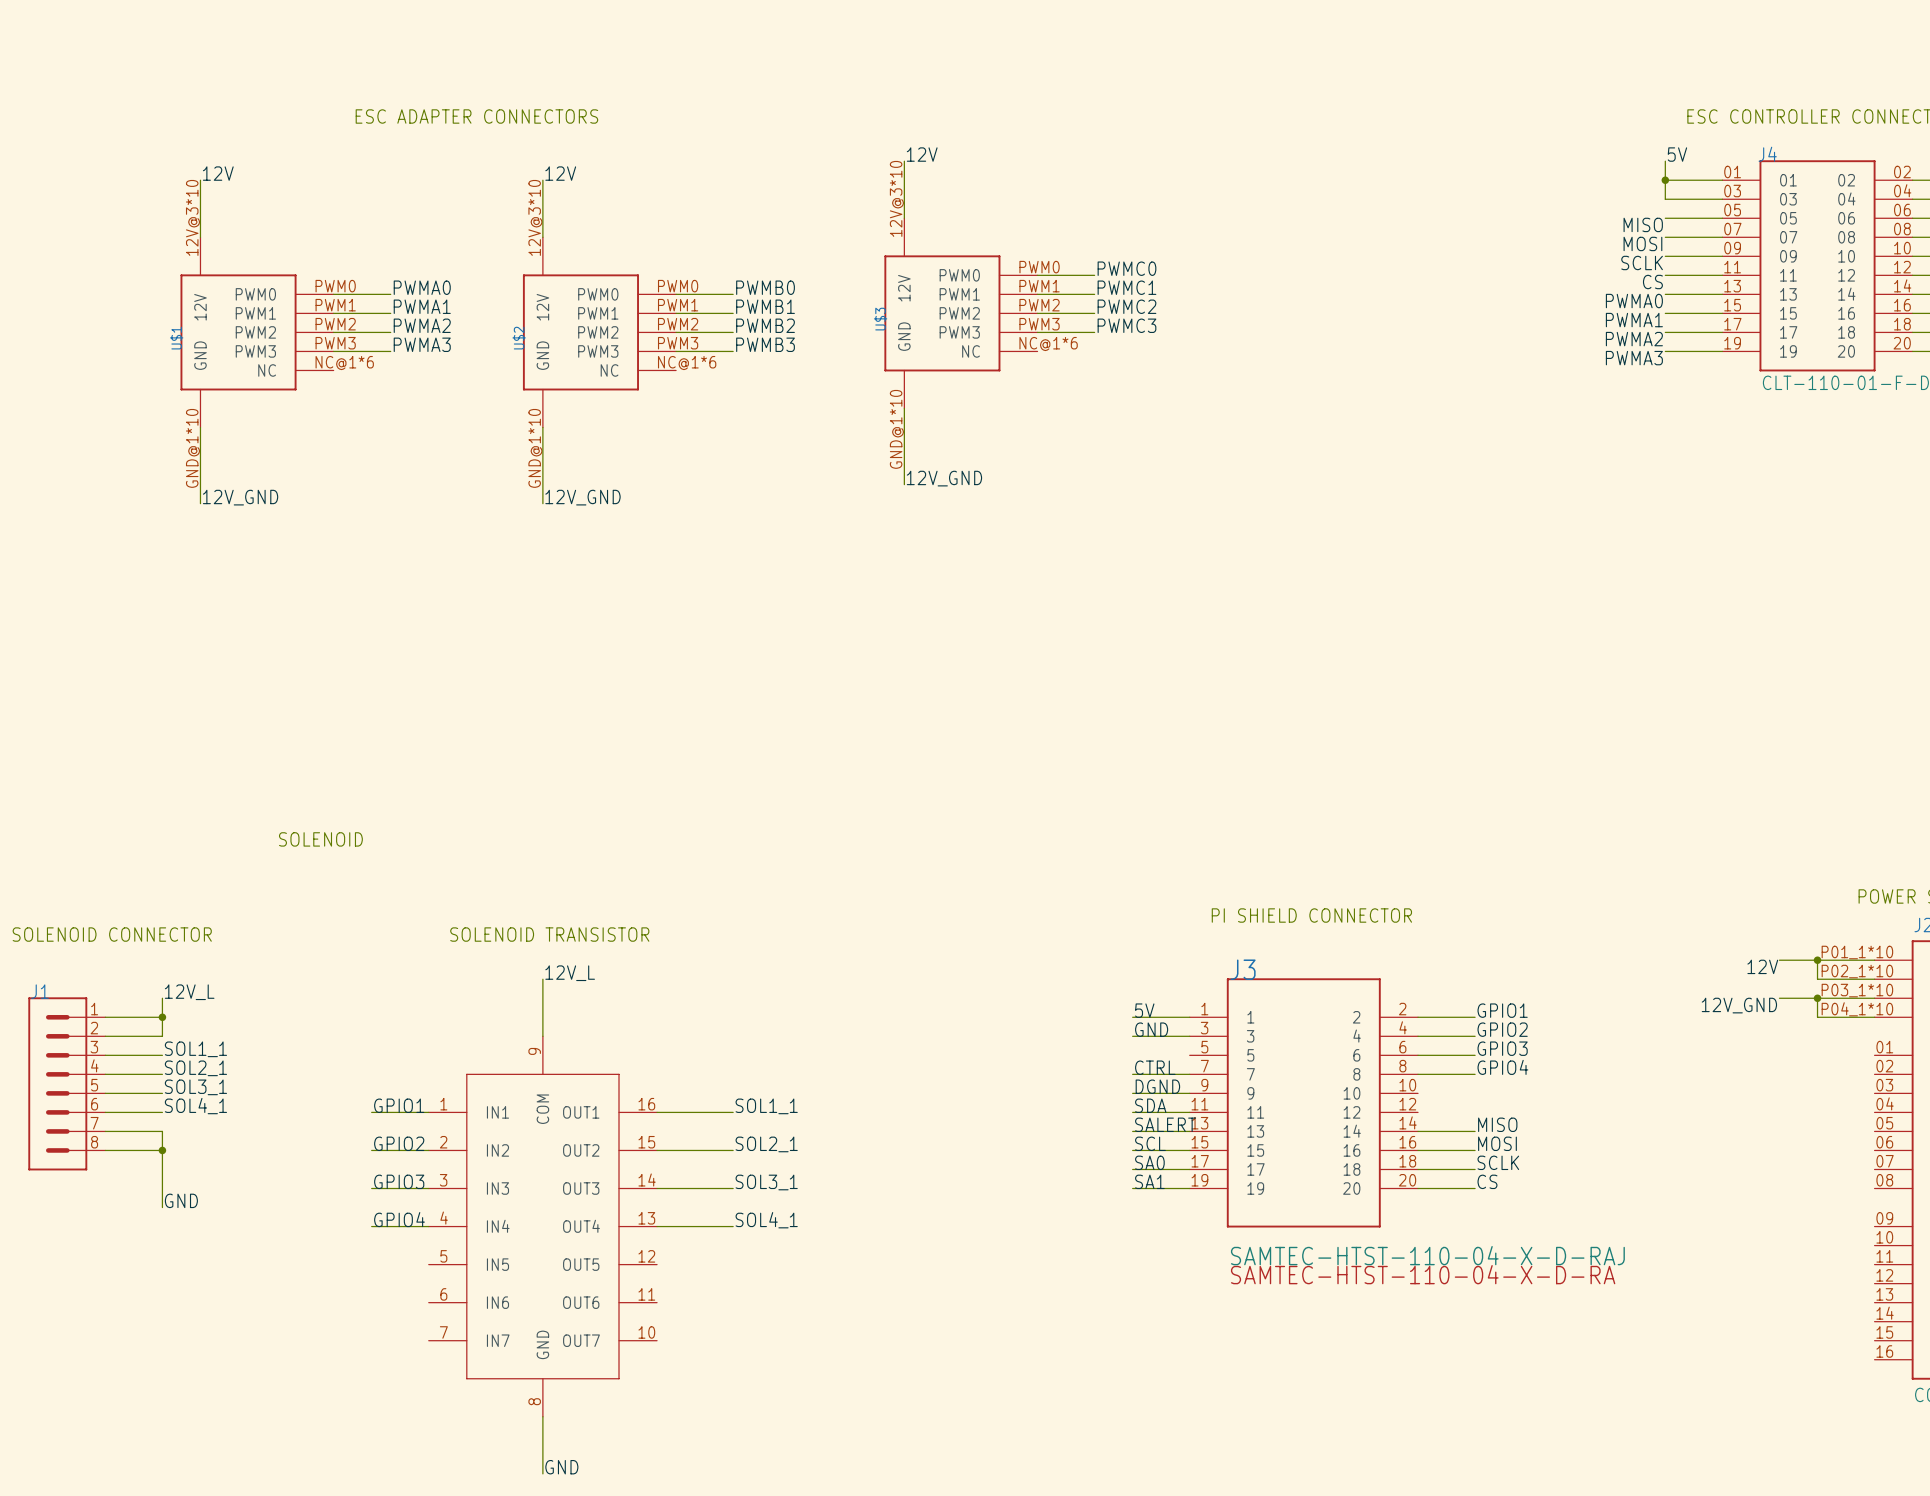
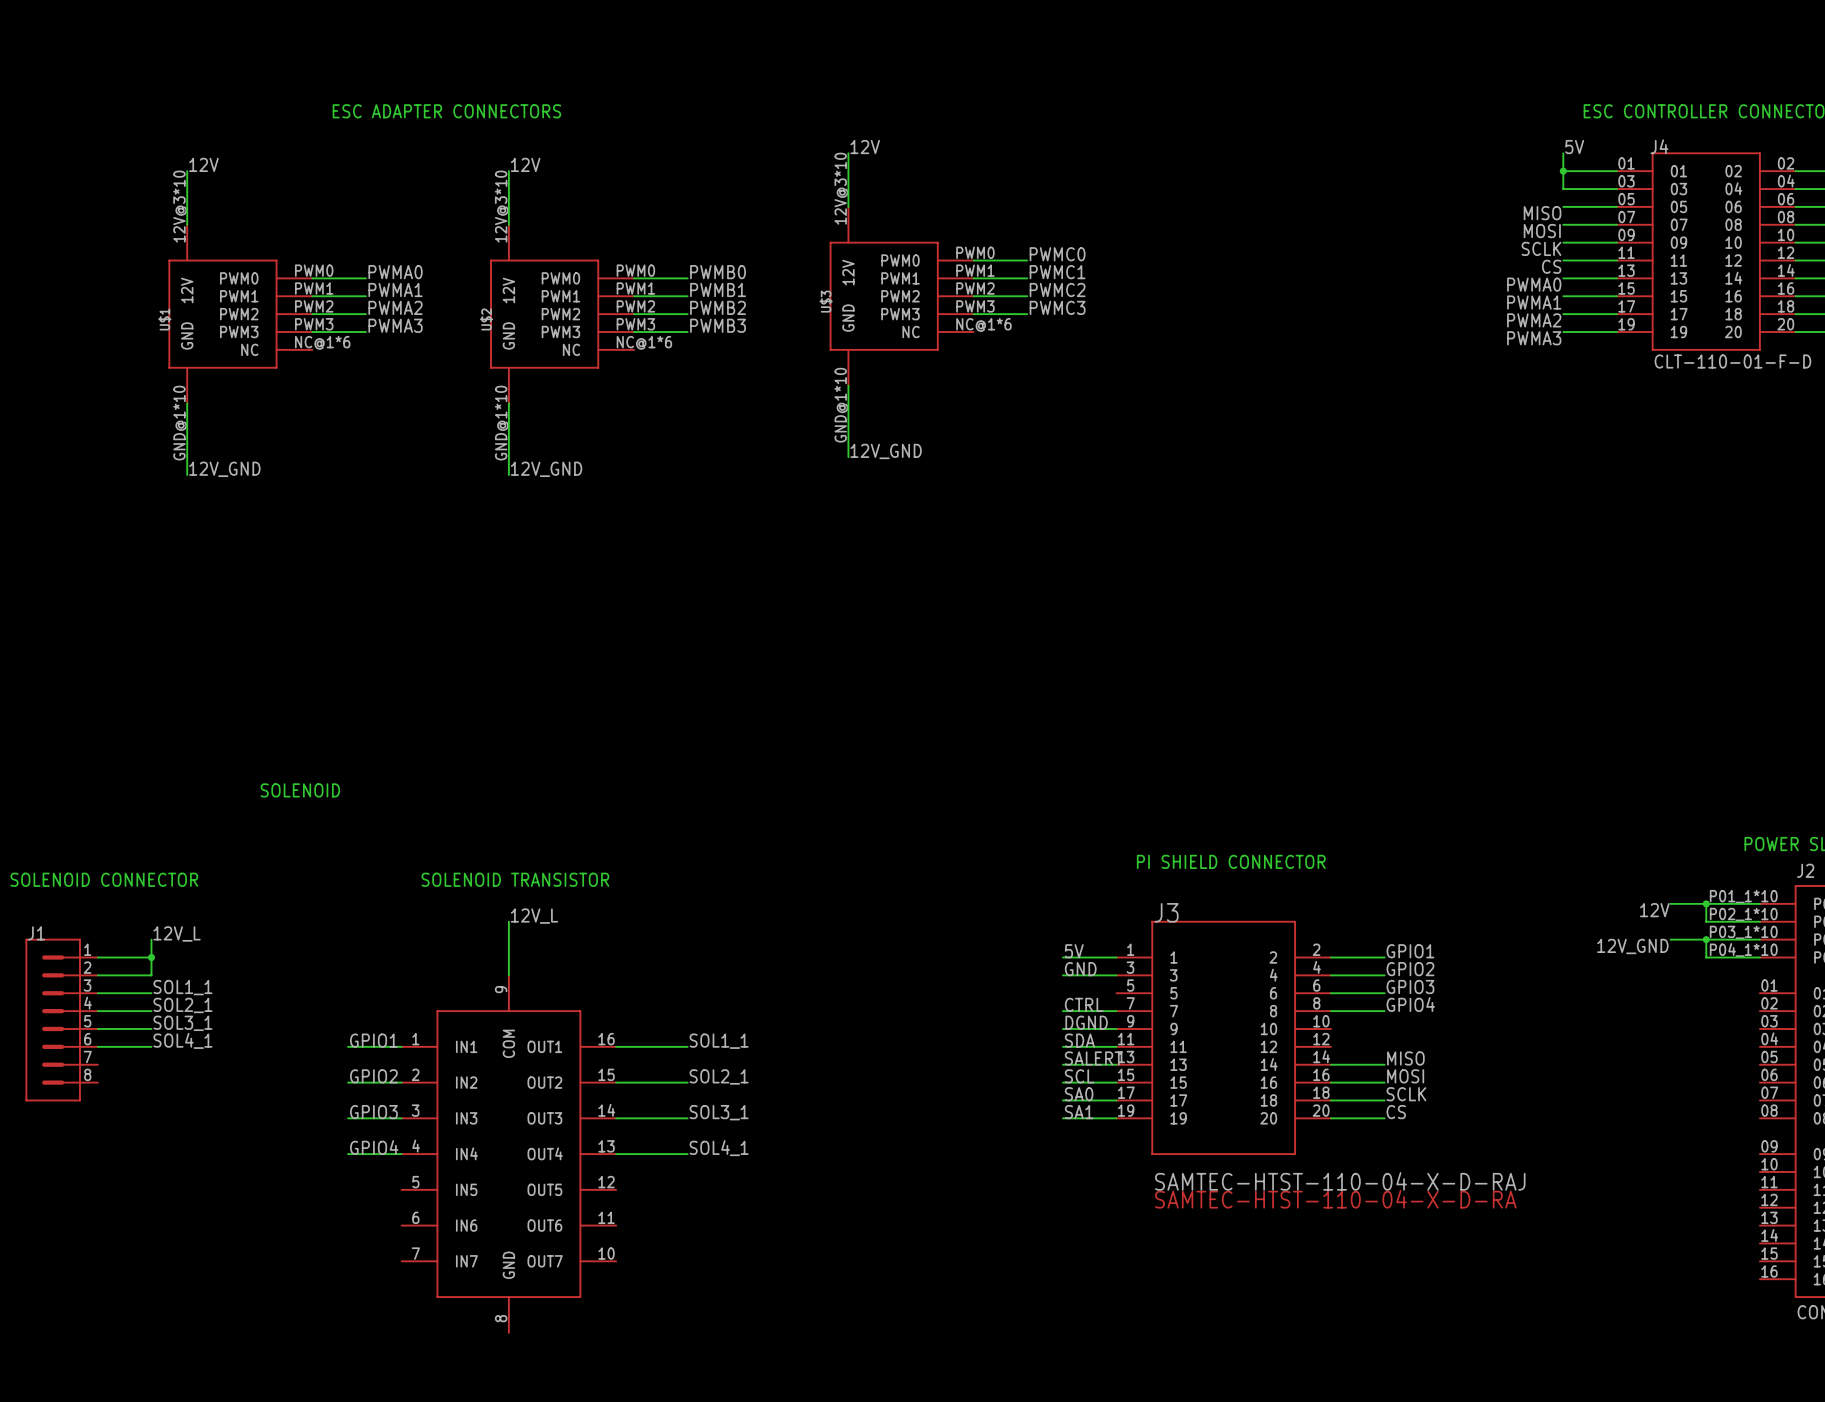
wire: (105, 1131) (162, 1131) (162, 1207) -> none
wire: (105, 1150) (162, 1150) -> none
junction: (162, 1150) -> none
label: GND (181, 1200) -> none
wire: (542, 1416) (542, 1473) -> none
label: GND (561, 1467) -> none

